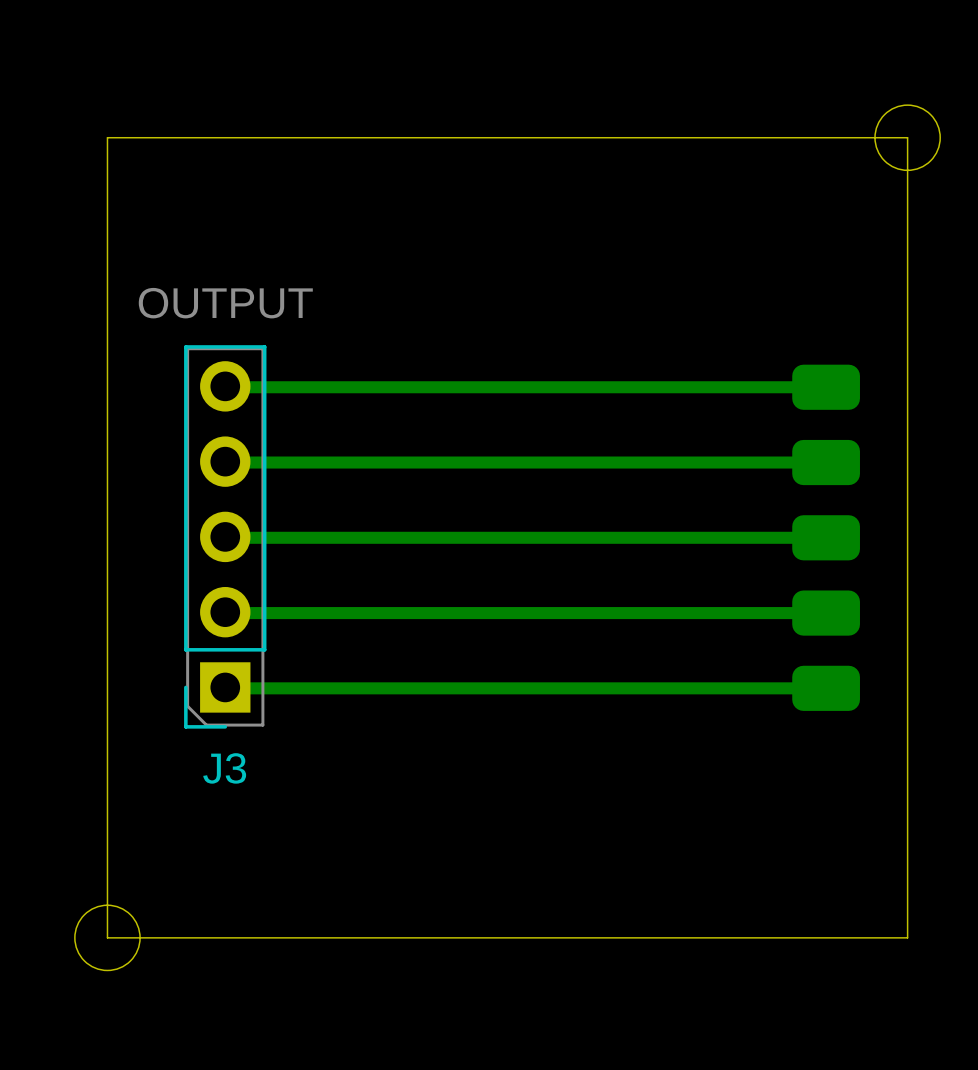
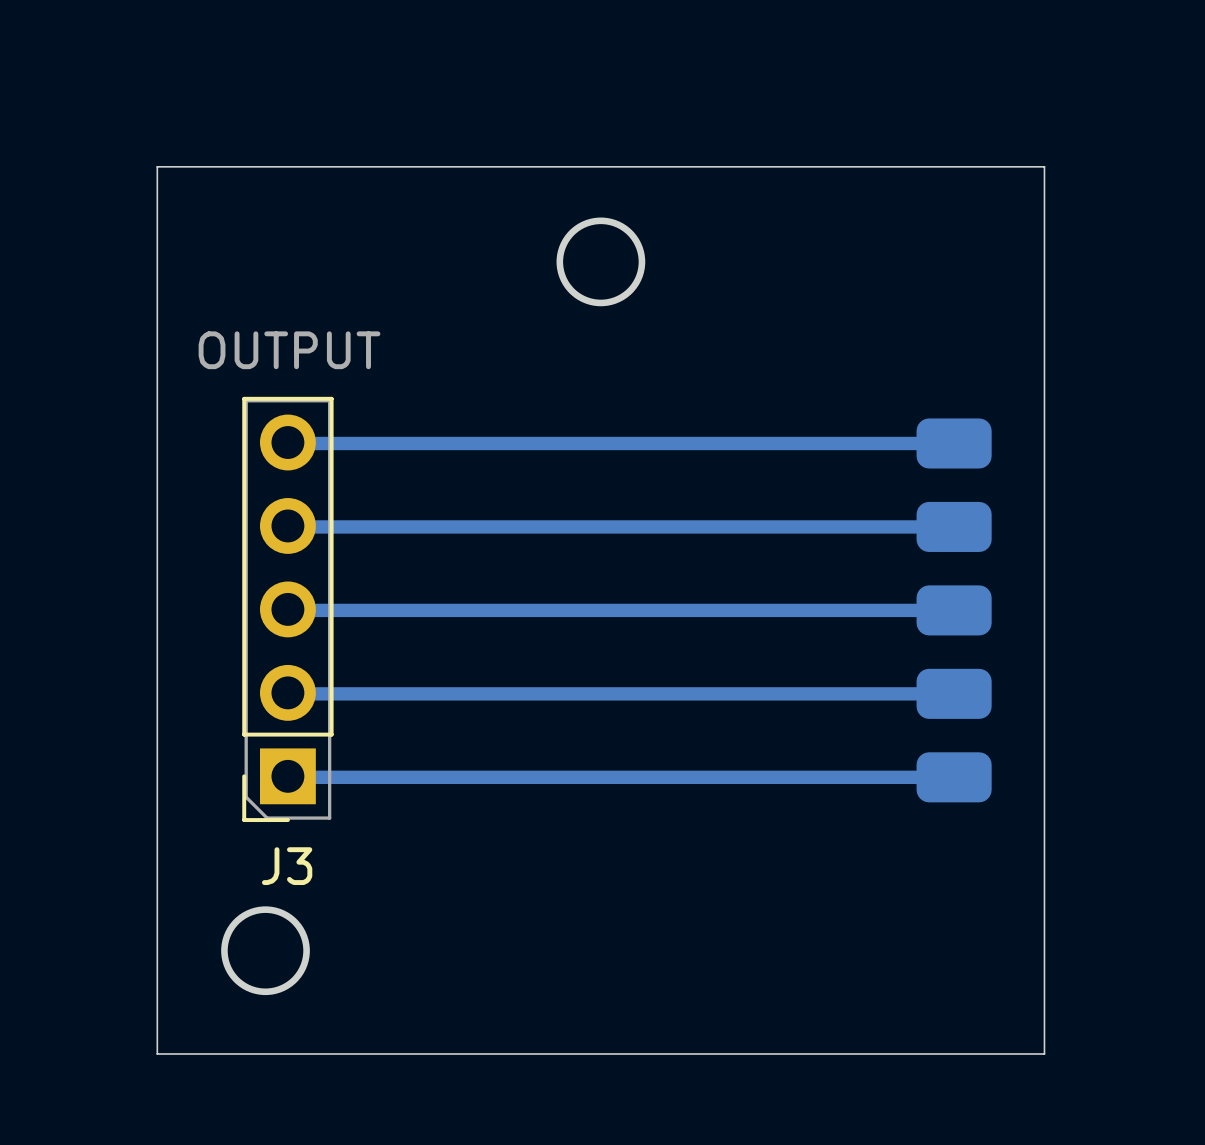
round board edge: [874, 104, 941, 172] -> none
round board edge: none -> [556, 217, 646, 307]
round board edge: none -> [221, 906, 310, 996]
round board edge: [74, 904, 141, 972] -> none

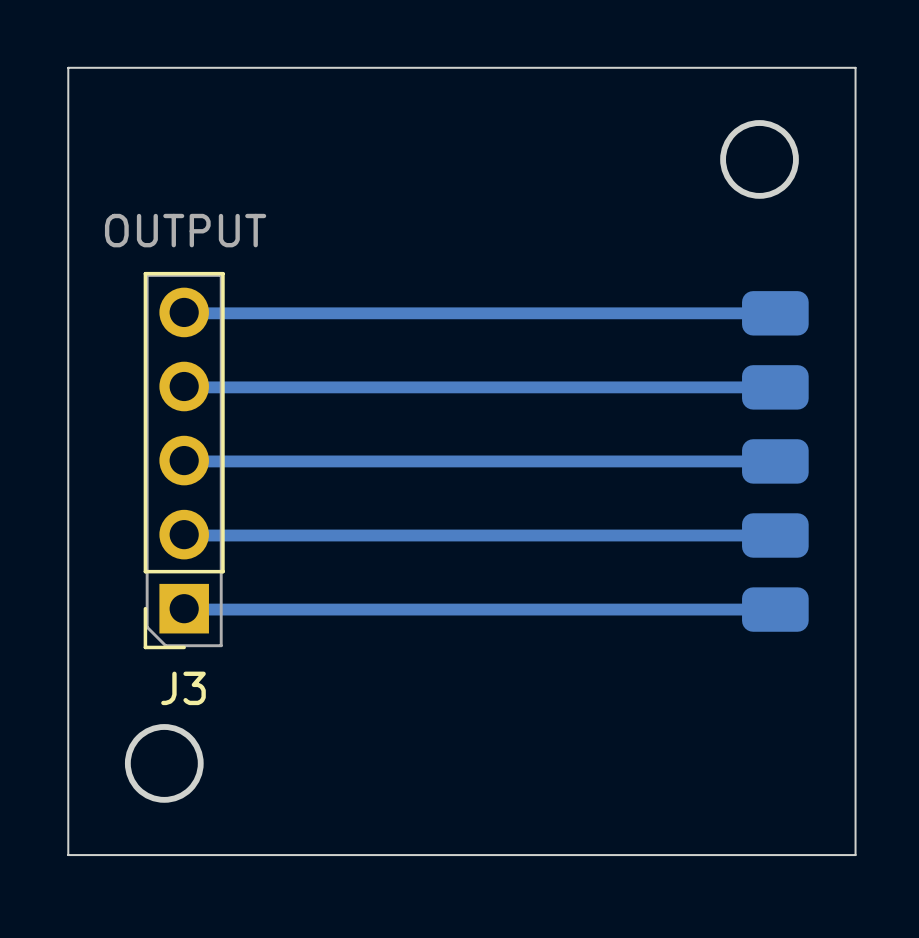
round board edge position: (600, 261) -> (759, 159)

